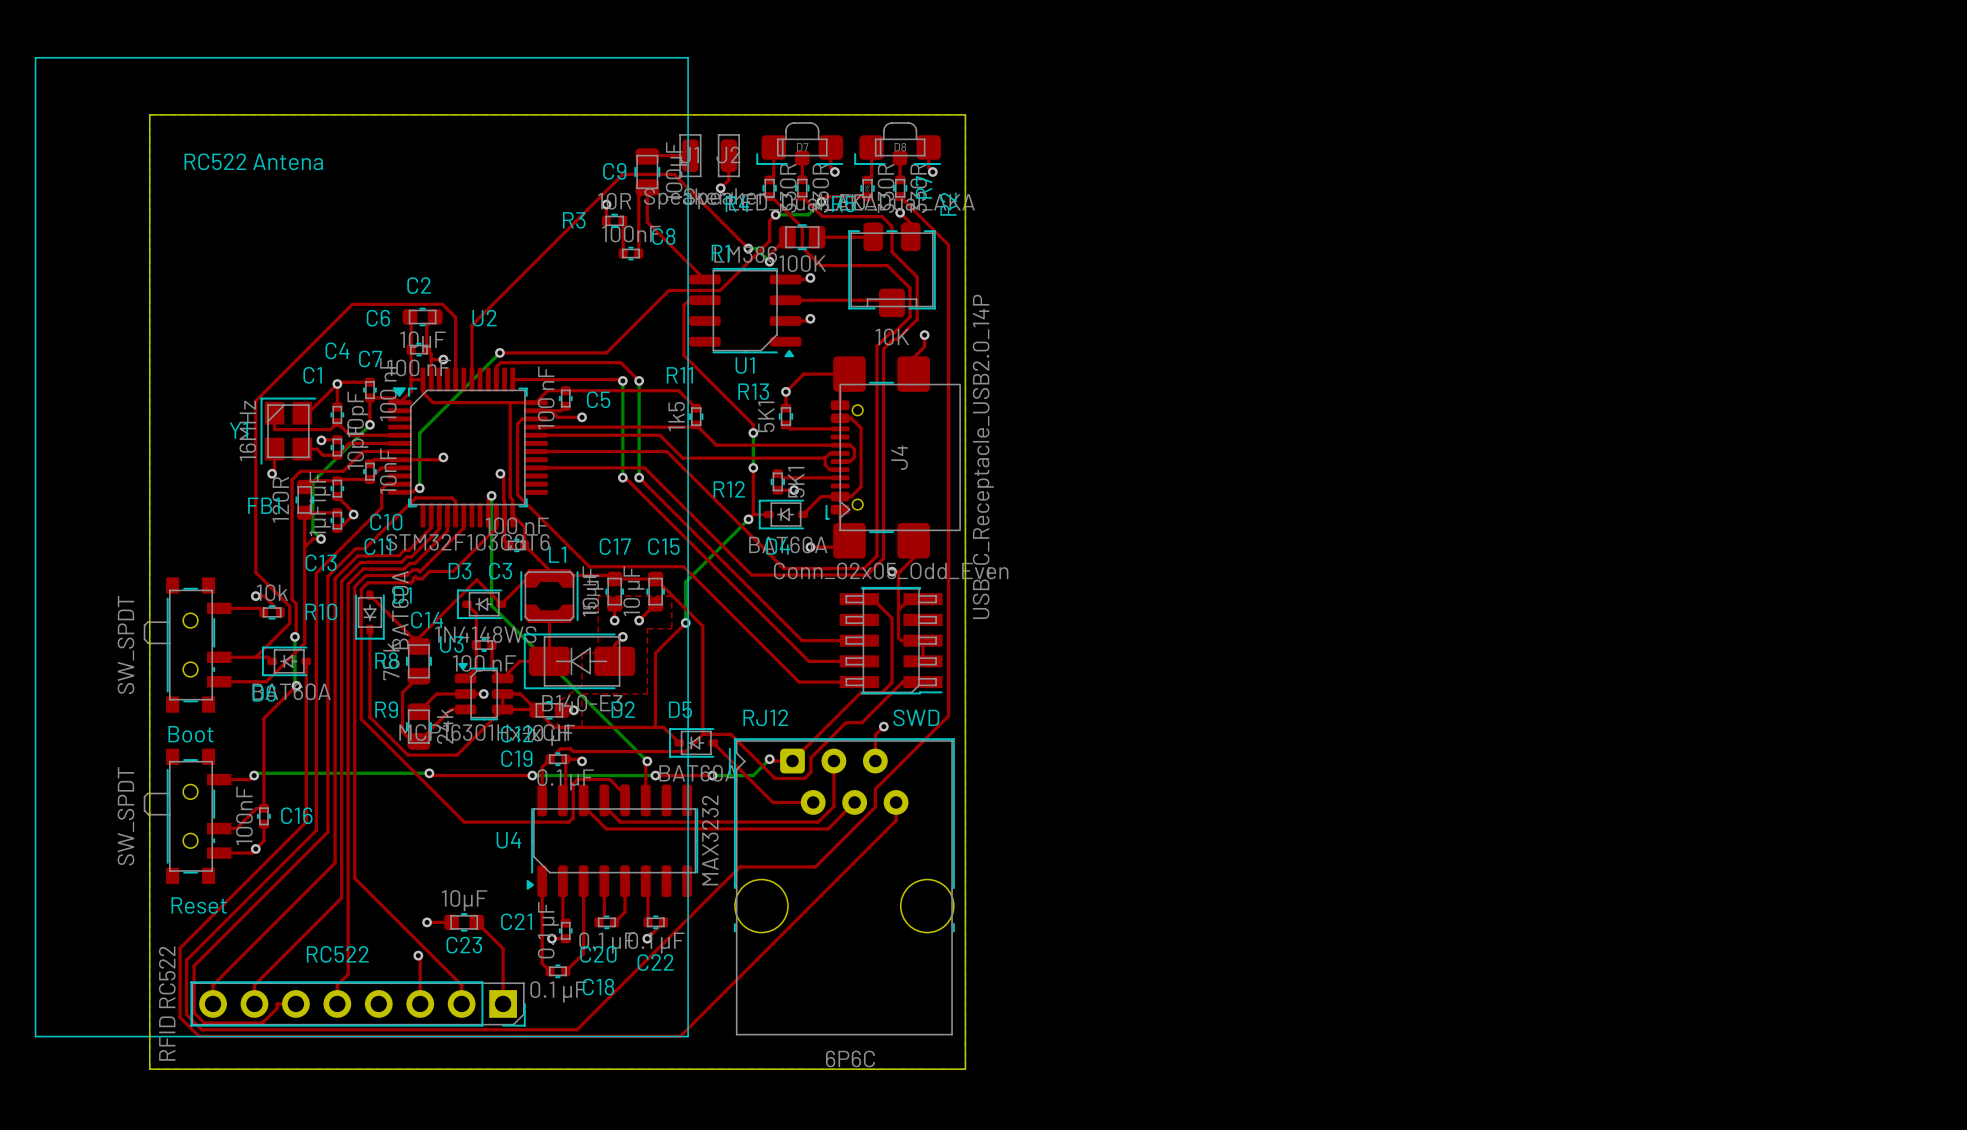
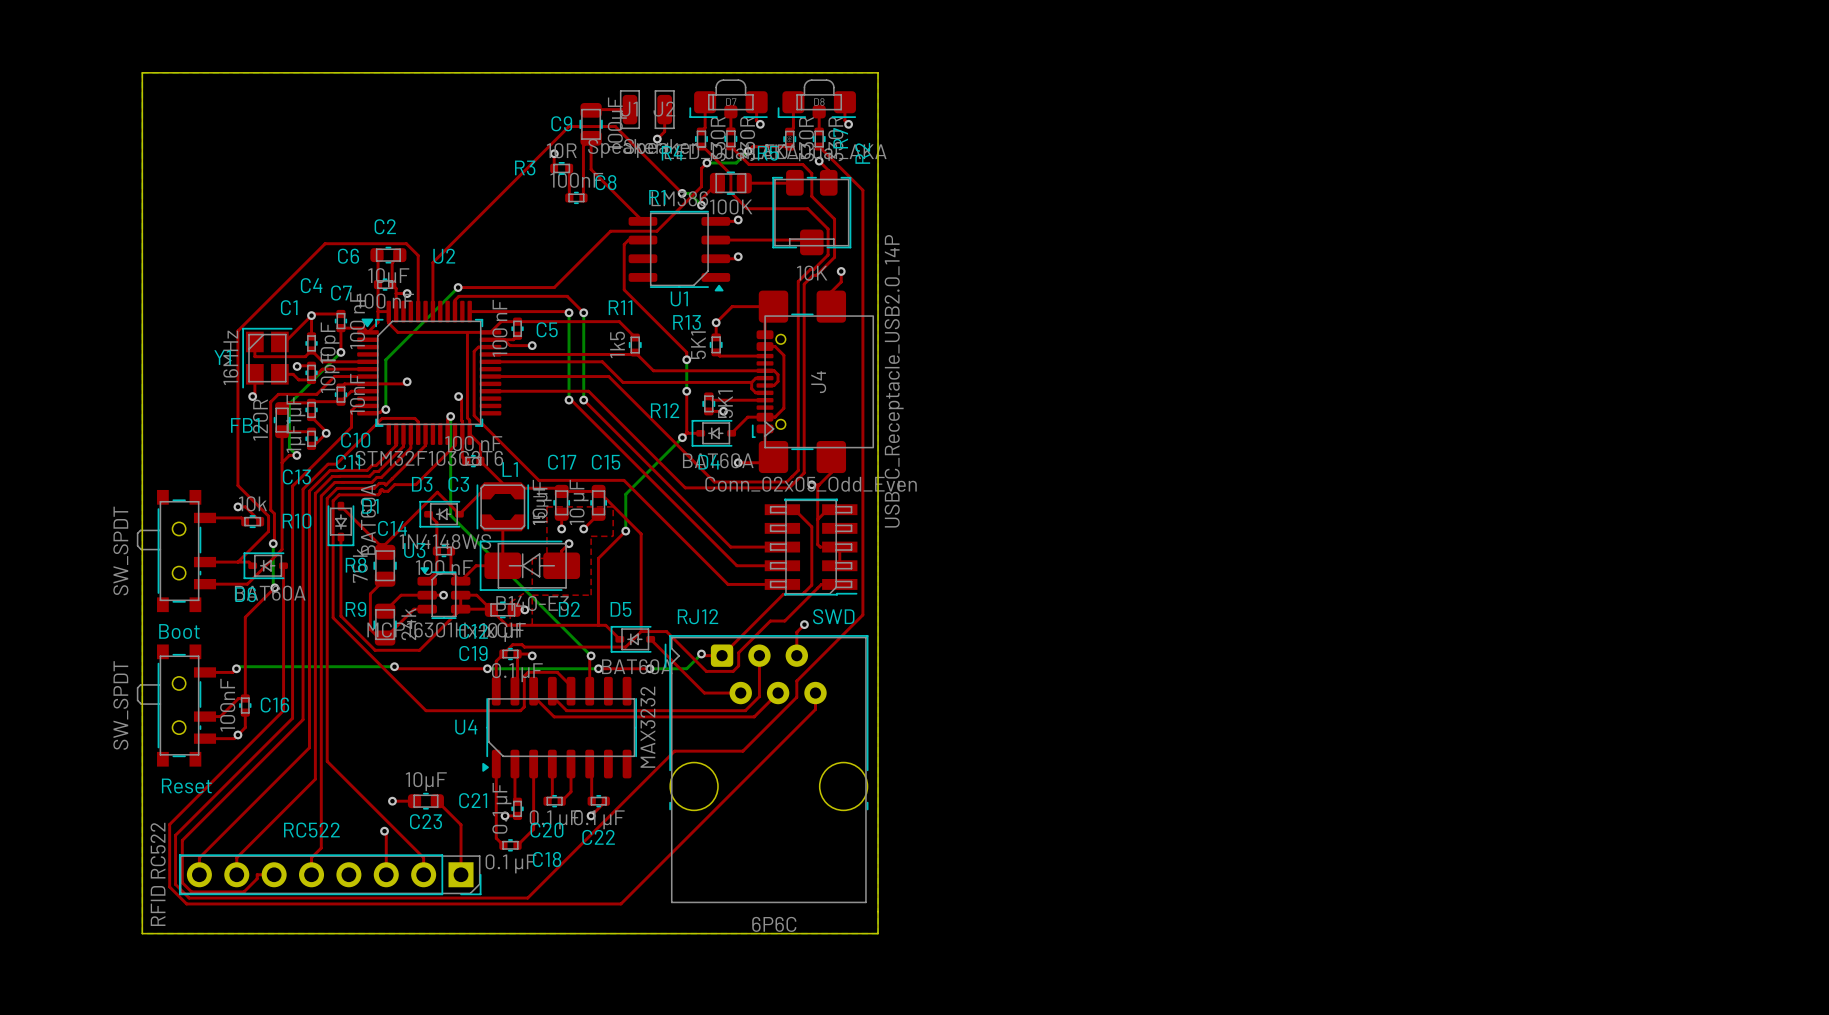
line: (35, 57) (688, 57) (688, 1036) (35, 1036) (35, 57) -> none
text: RC522 Antena (253, 161) -> none

